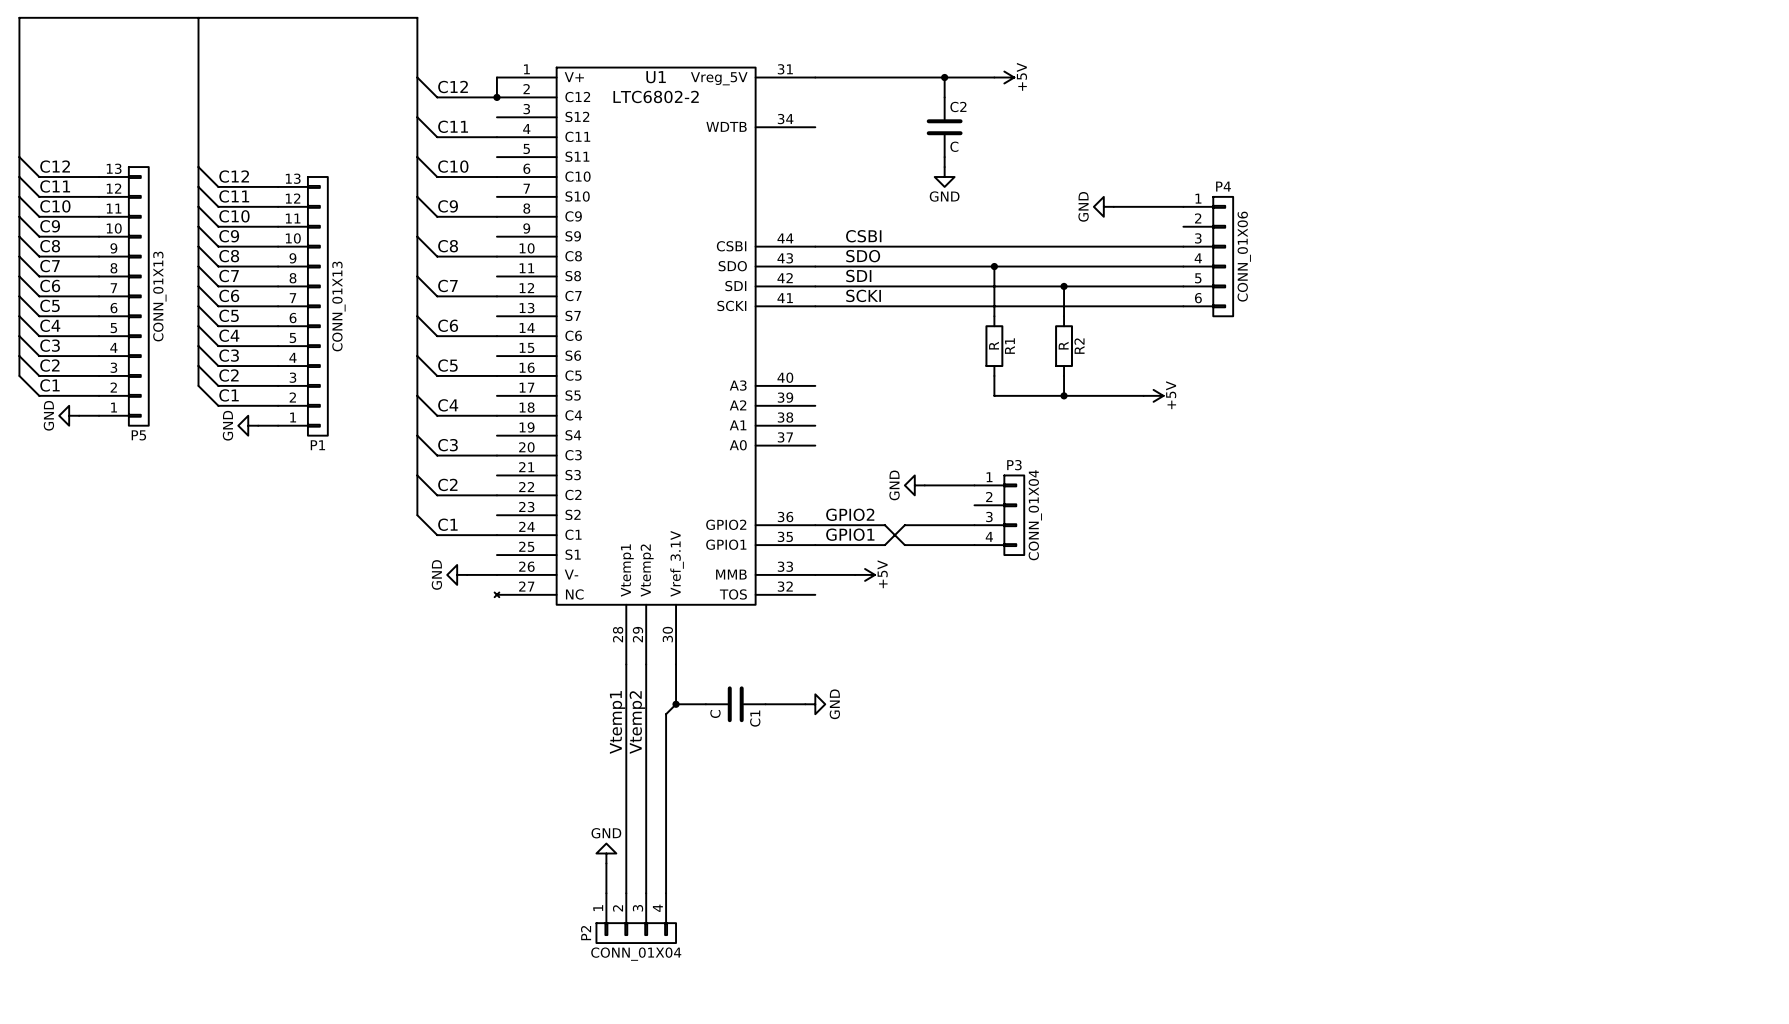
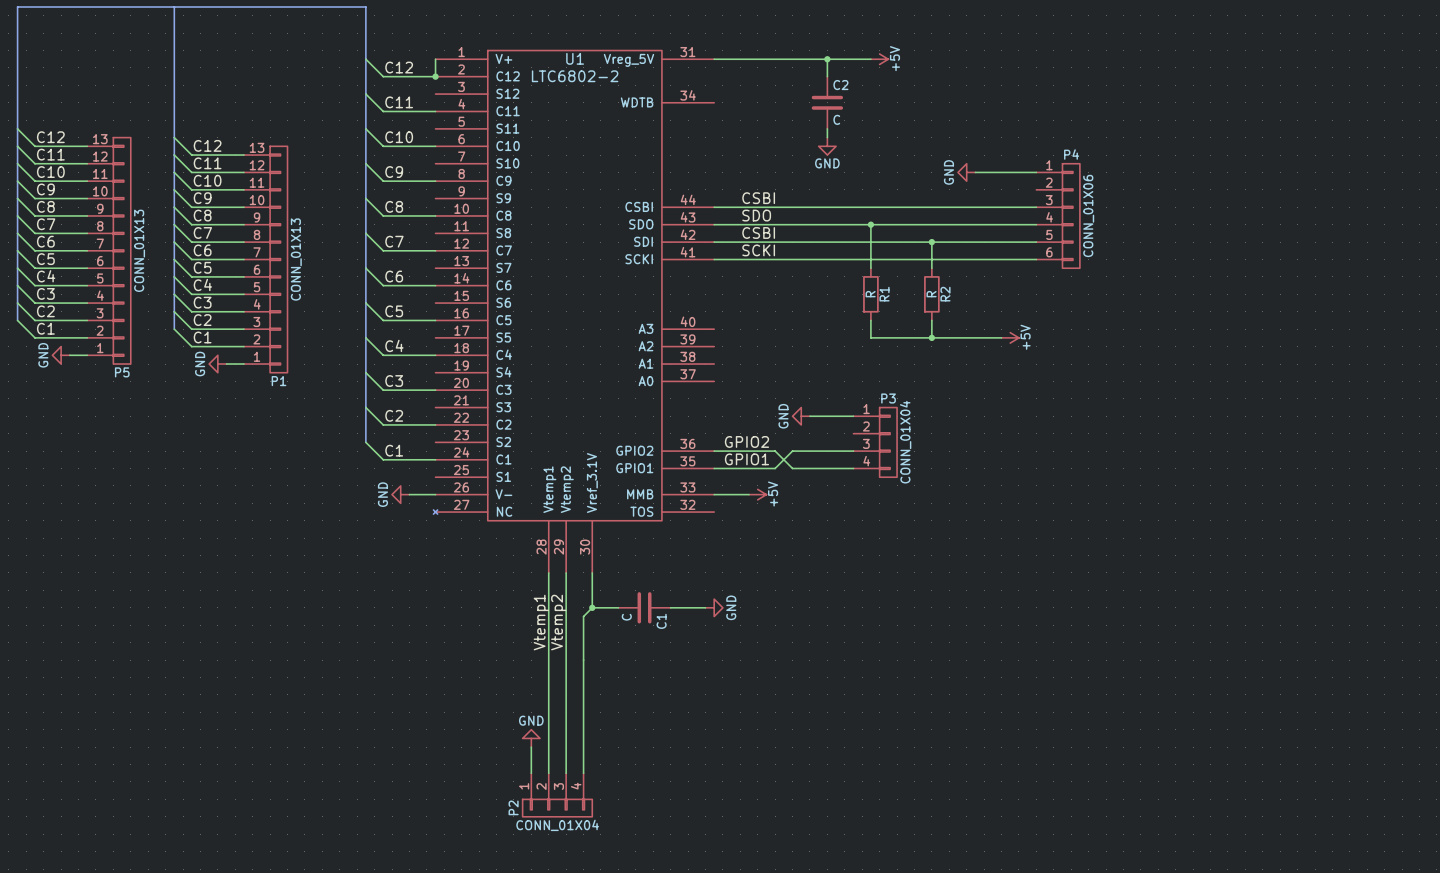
label: SDI (858, 276) -> CSBI (758, 232)

